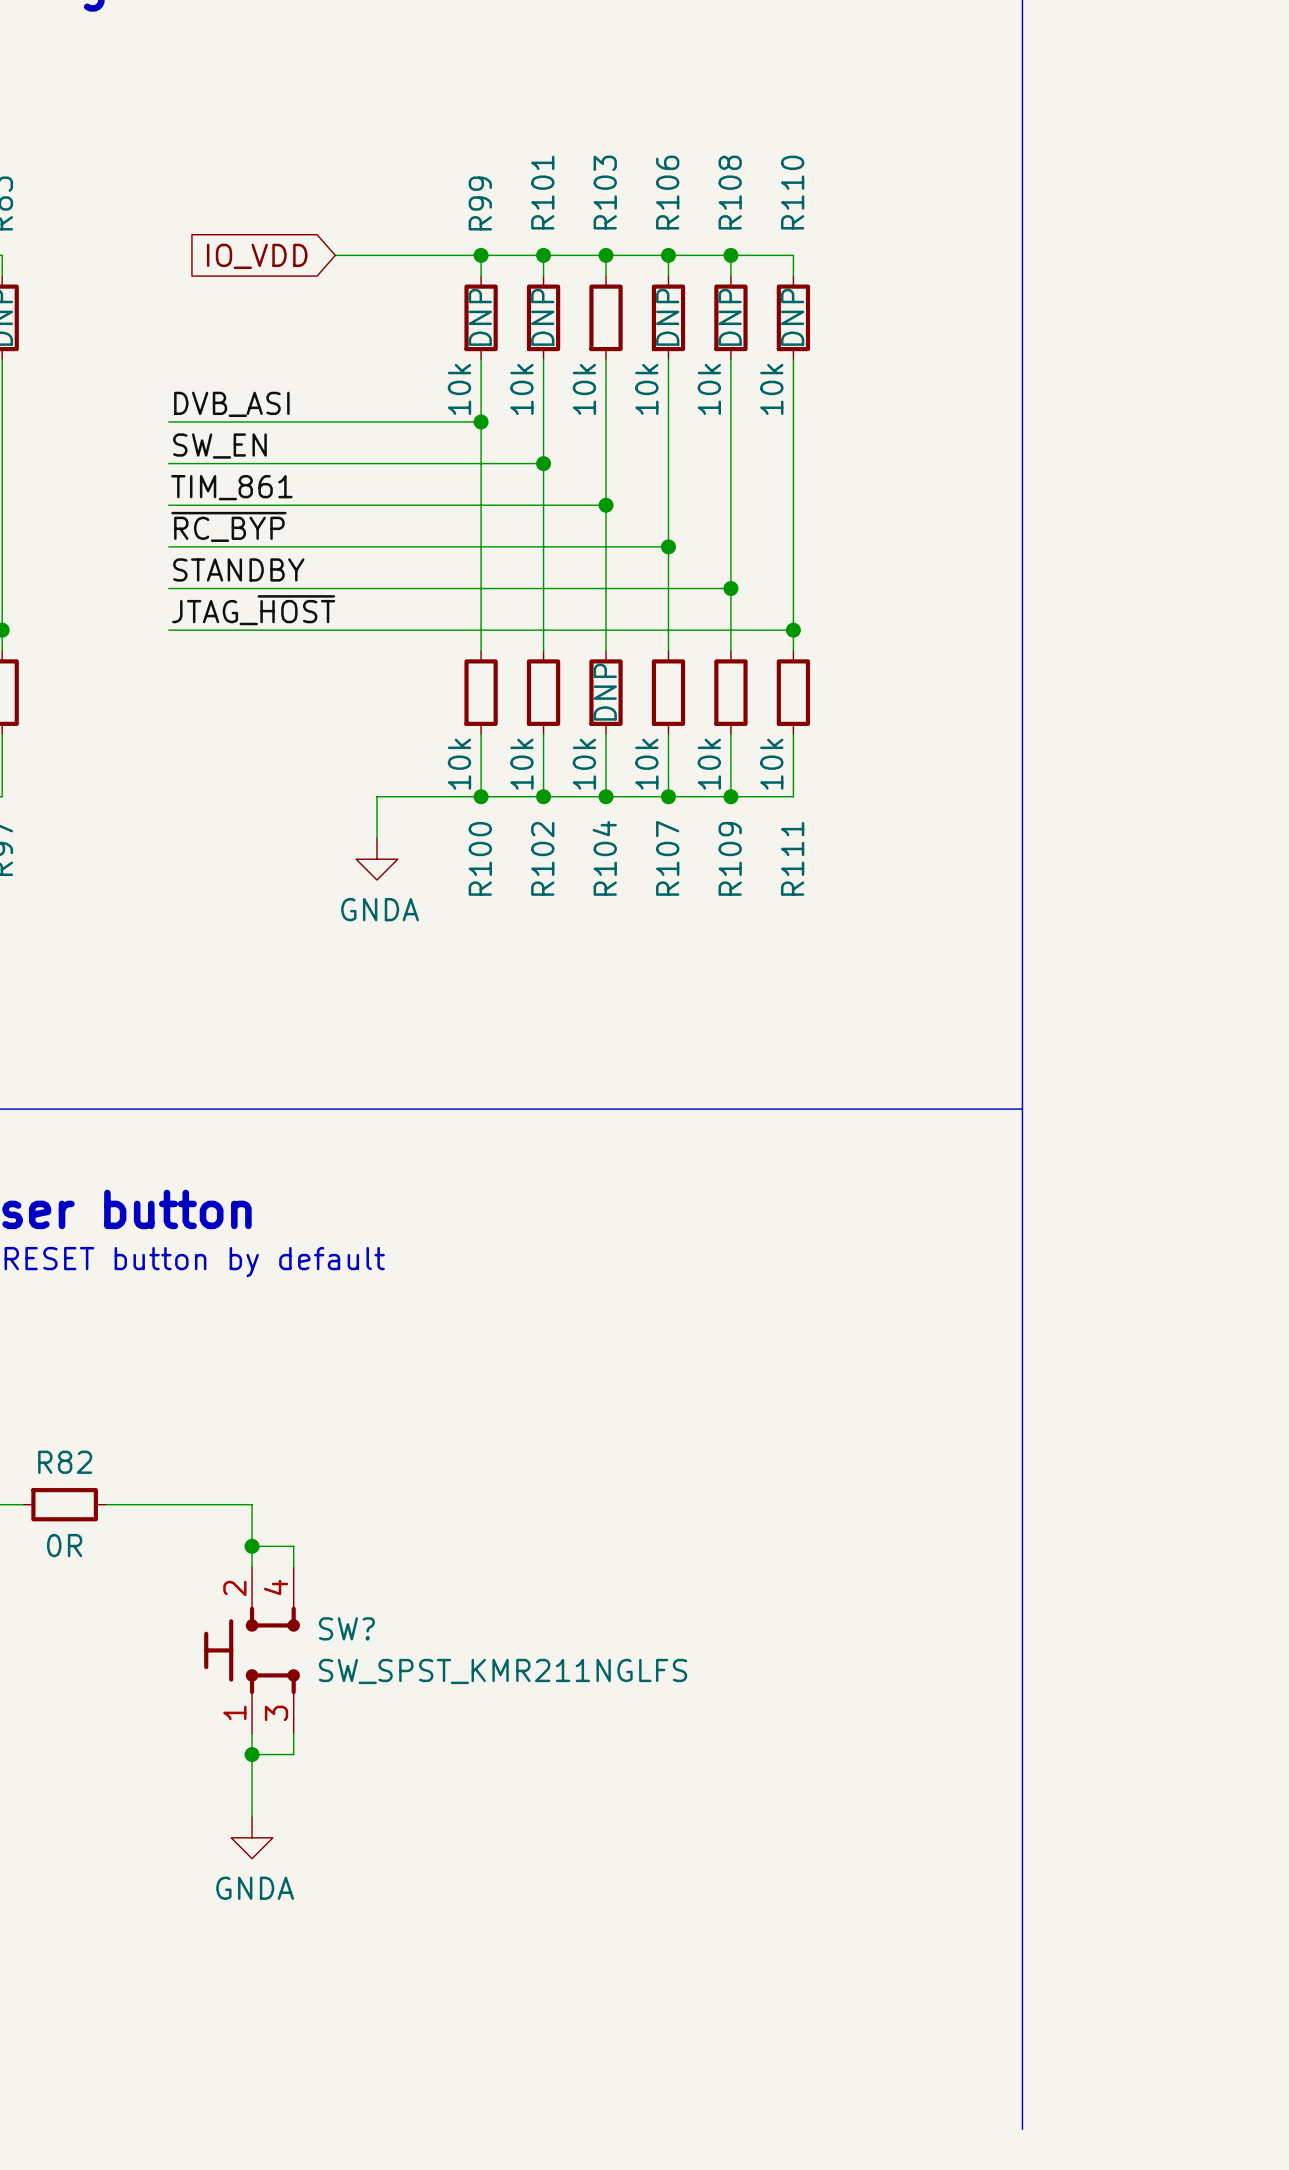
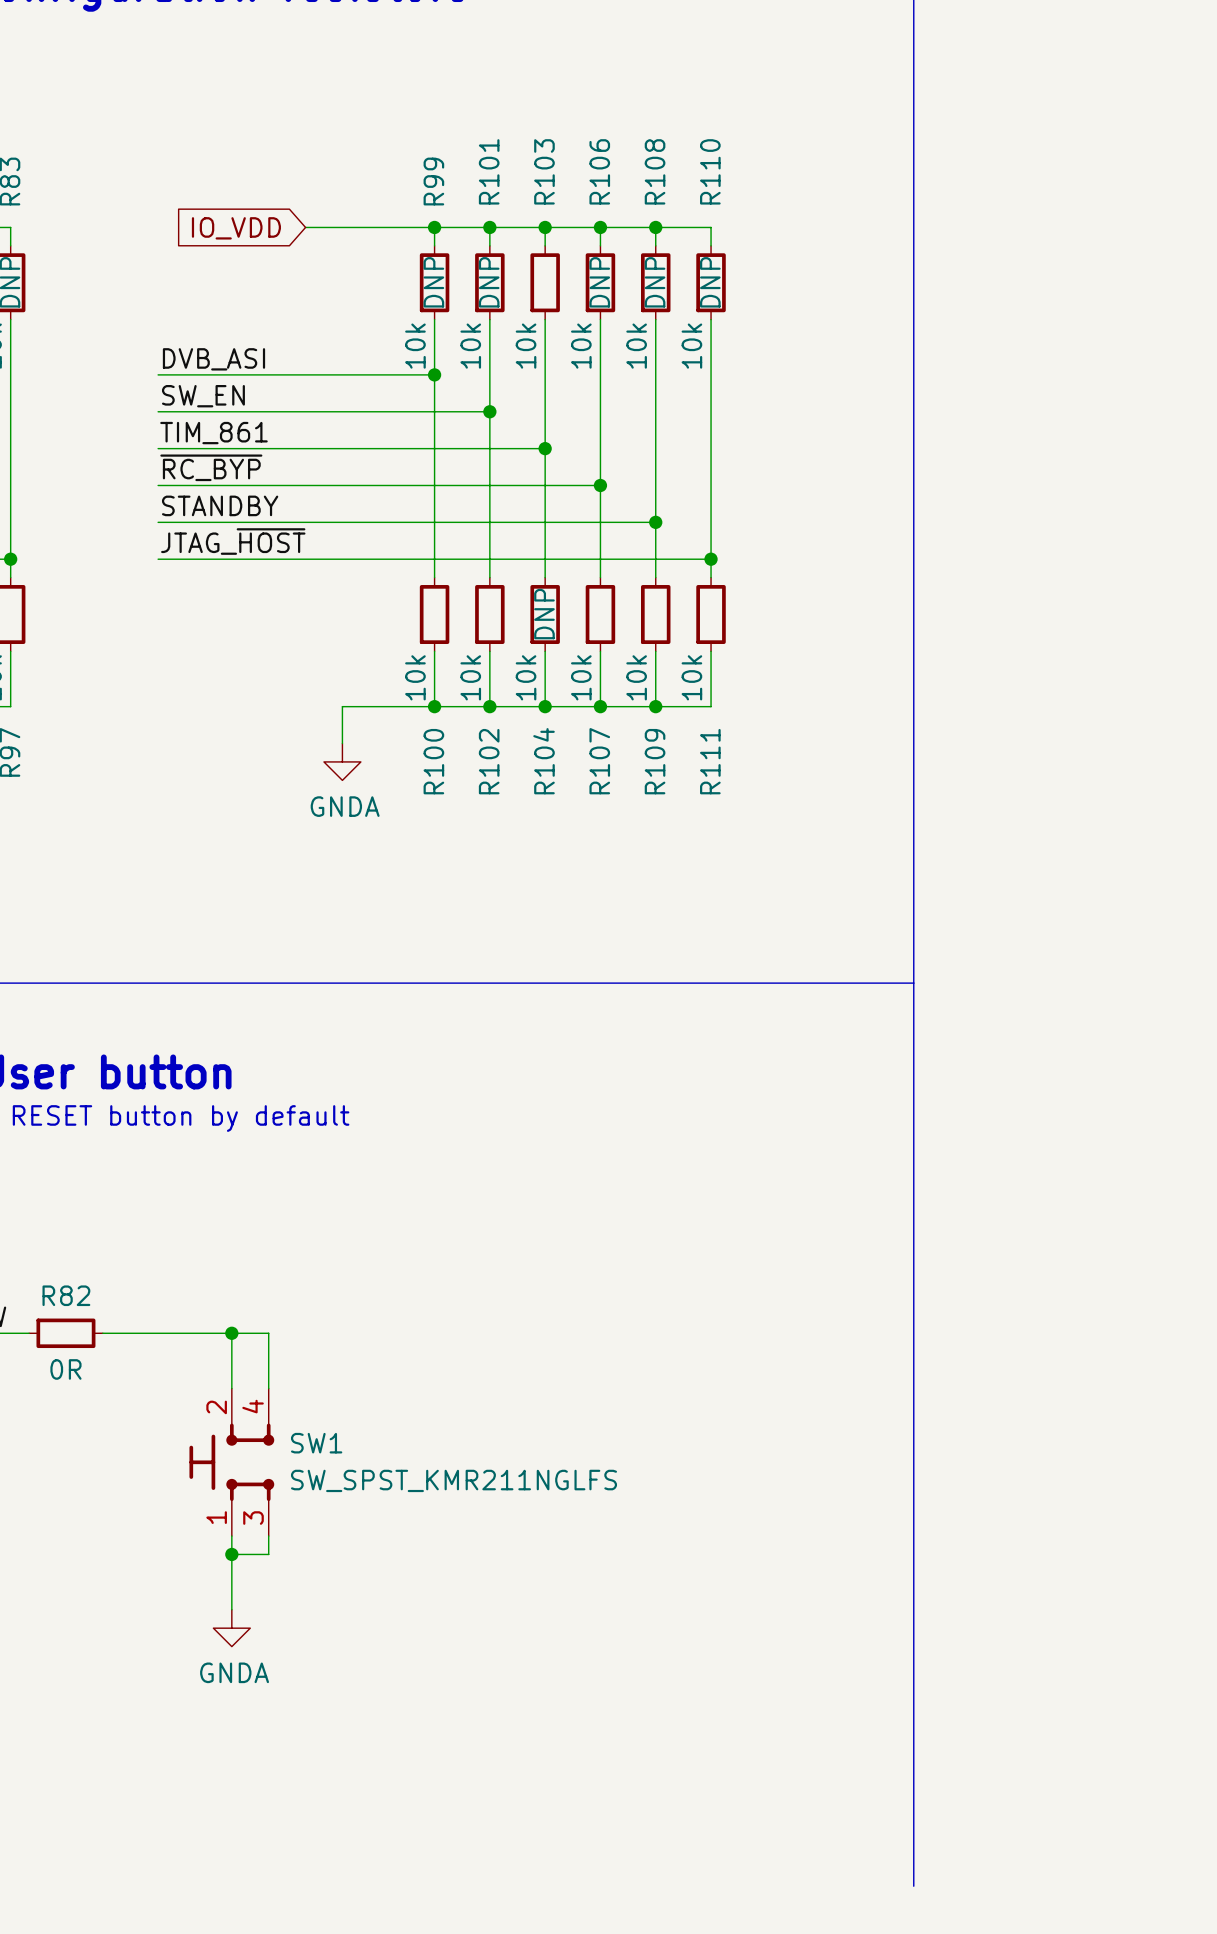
wire: (252, 1546) (293, 1546) -> (231, 1333) (268, 1333) (268, 1370)
junction position: (252, 1546) -> (231, 1333)
SW? name: SW? (346, 1628) -> SW1 (316, 1443)

